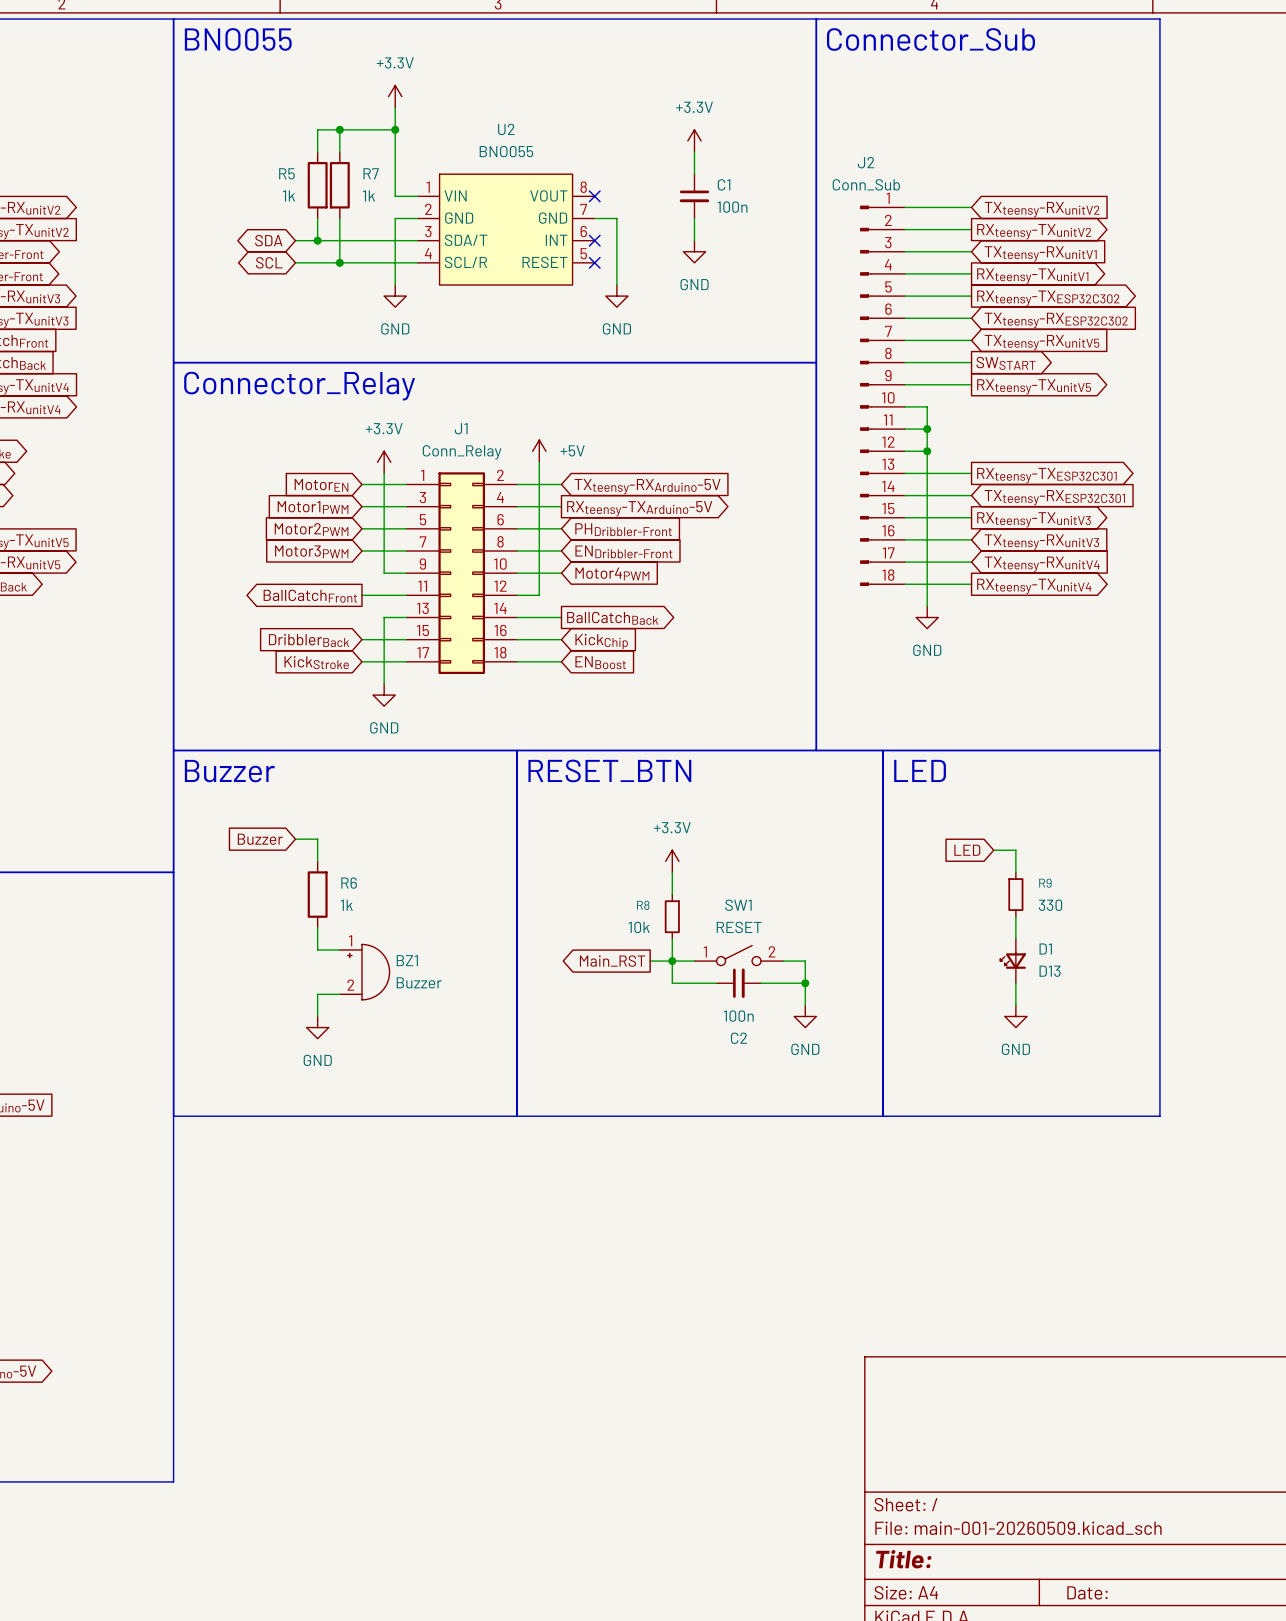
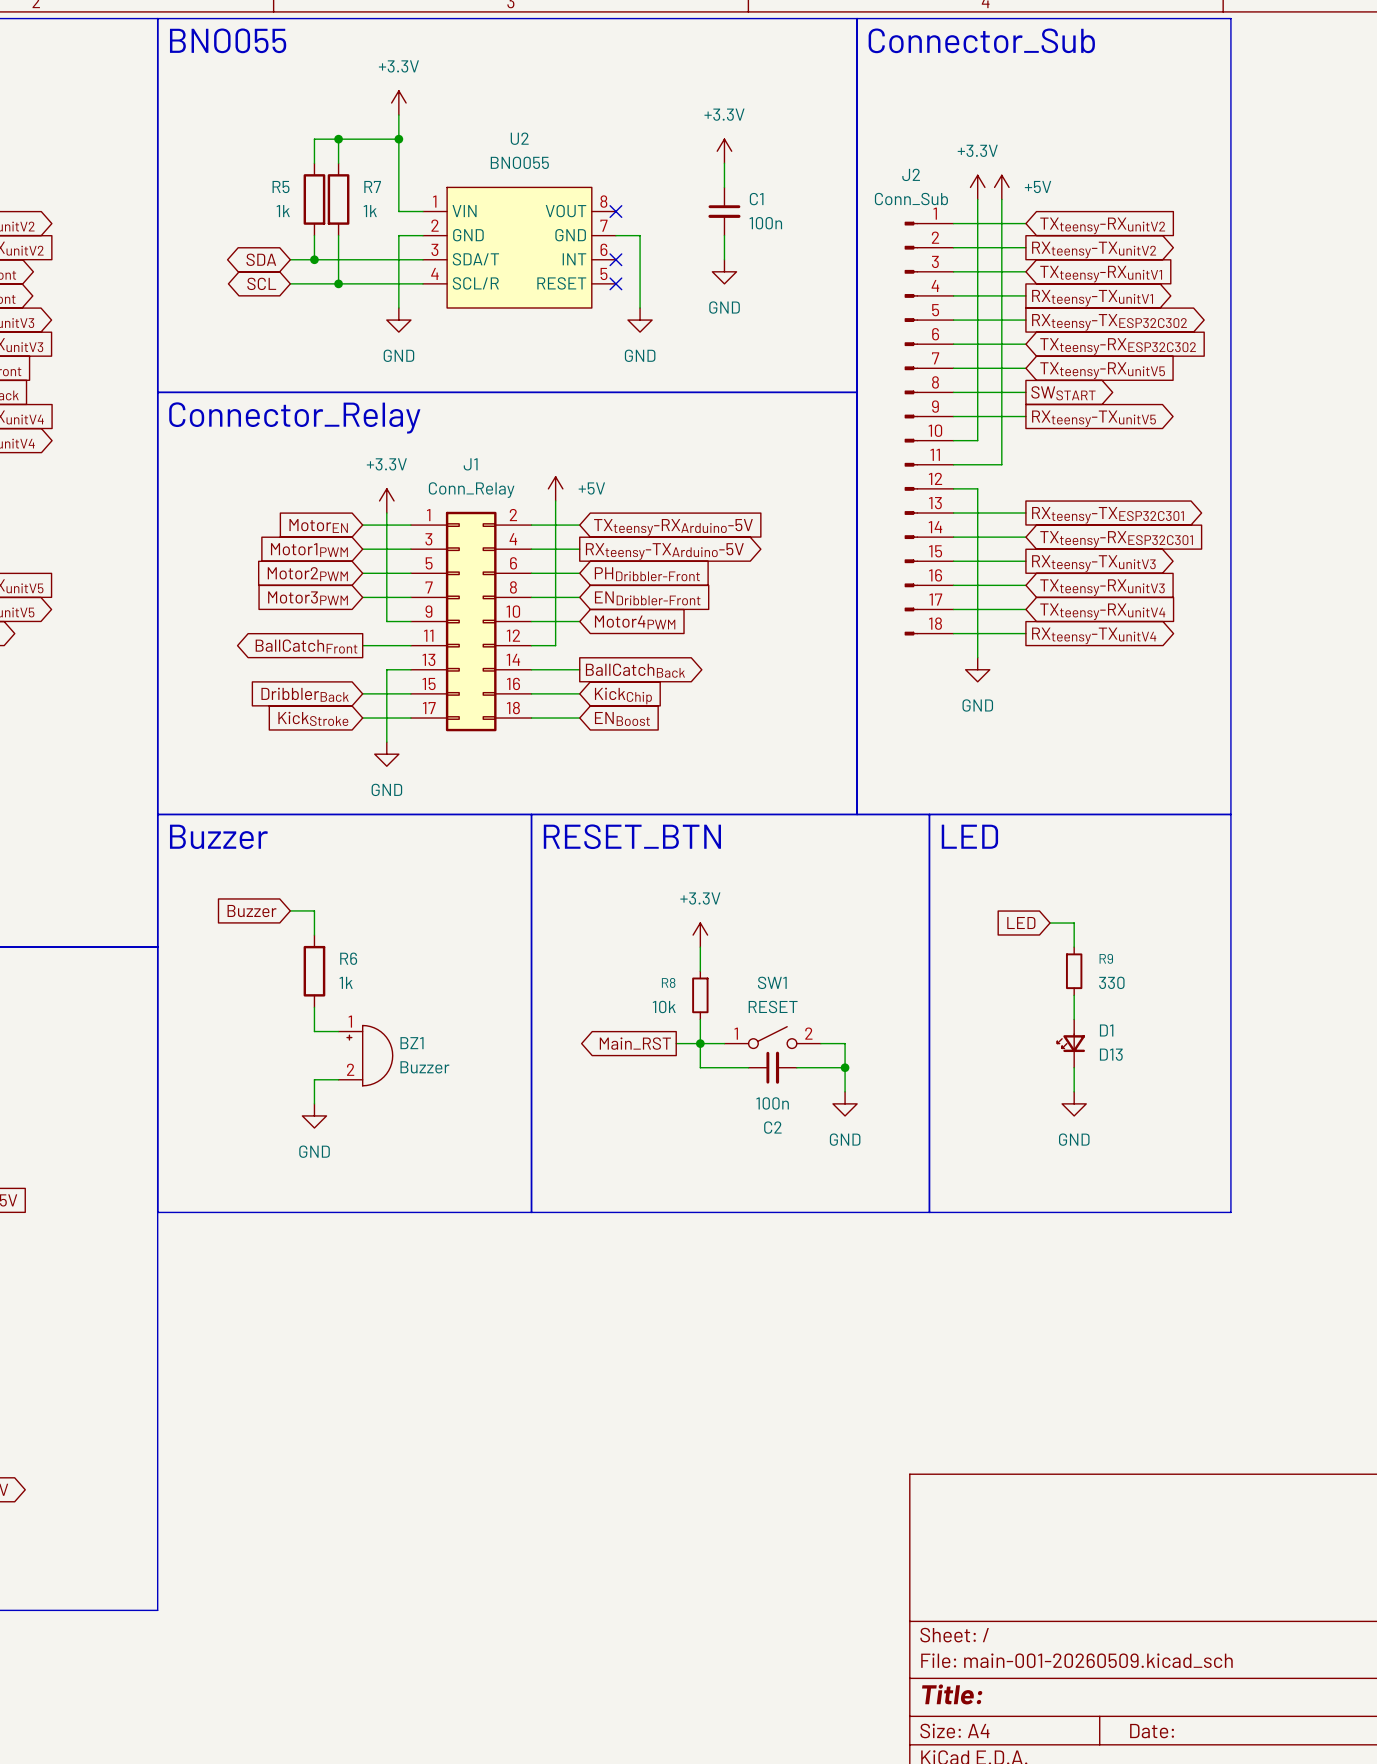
power symbol: none -> +3.3V (977, 187)
power symbol: none -> +5V (1001, 187)
wire: none -> (1001, 199) (1001, 464) (977, 464)
wire: (927, 406) (927, 451) -> (977, 440) (977, 199)
junction: (927, 429) -> none
junction: (927, 451) -> none

